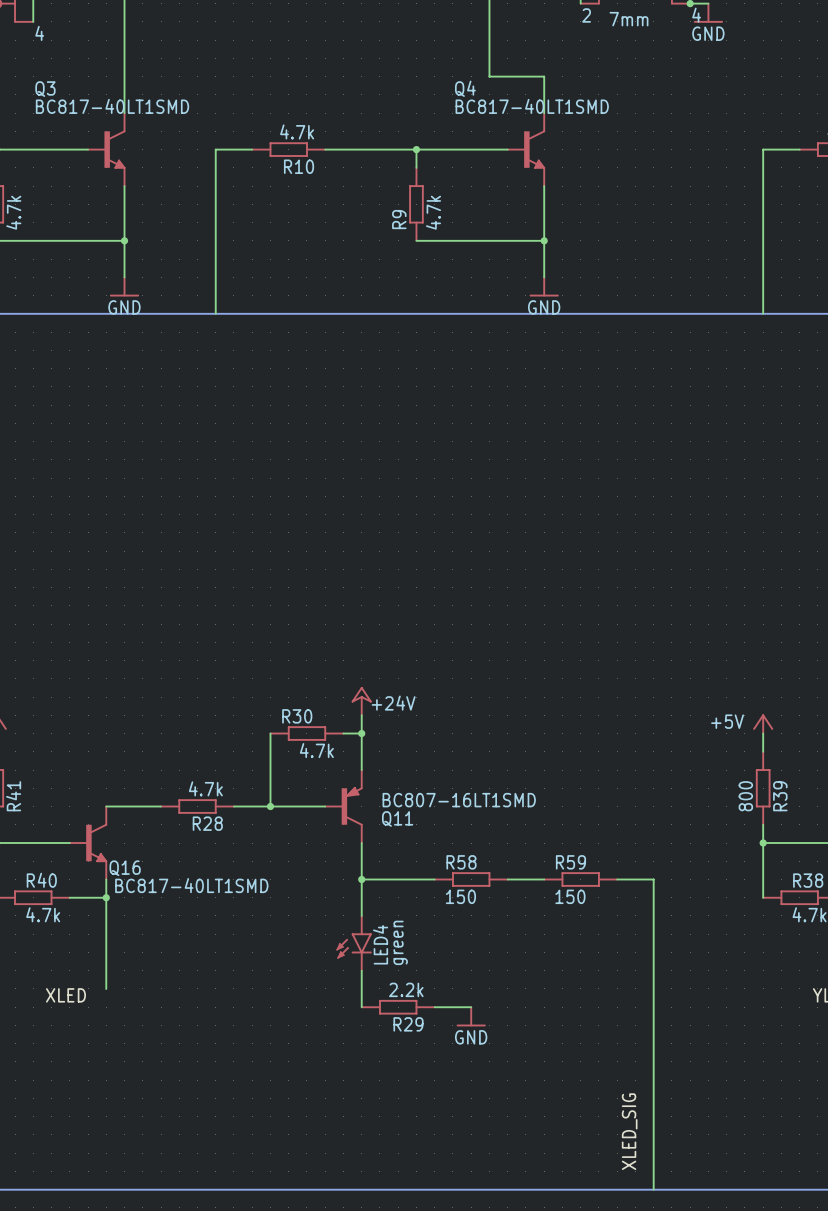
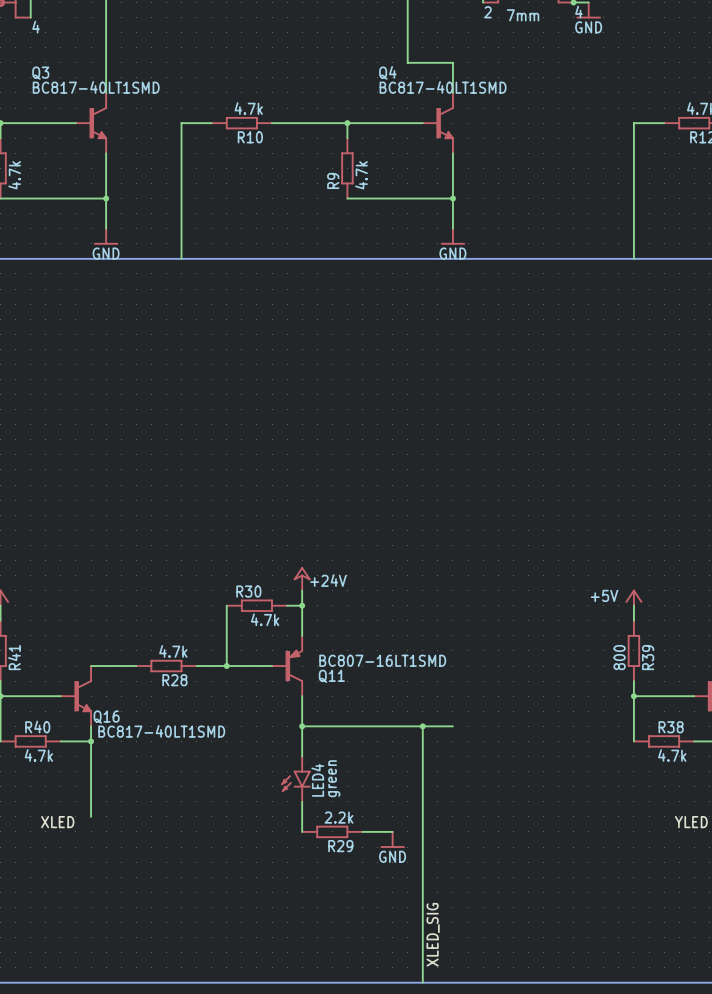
wire: none -> (362, 726) (422, 726) (422, 982)
R58: 150 (471, 879) -> none
junction: none -> (422, 726)
R59: 150 (580, 879) -> none
wire: (617, 879) (653, 879) (653, 1189) -> none
label position: XLED_SIG (629, 1131) -> XLED_SIG (433, 934)

